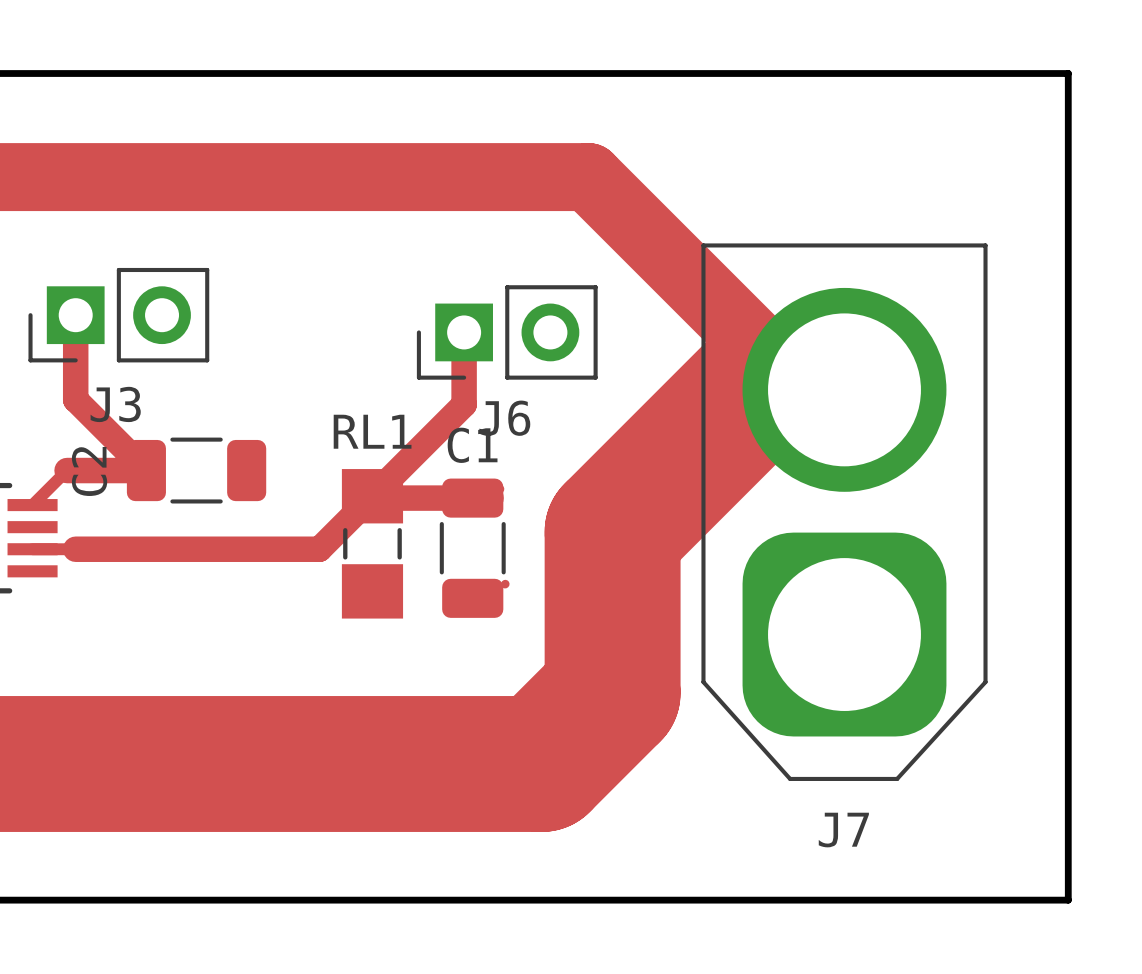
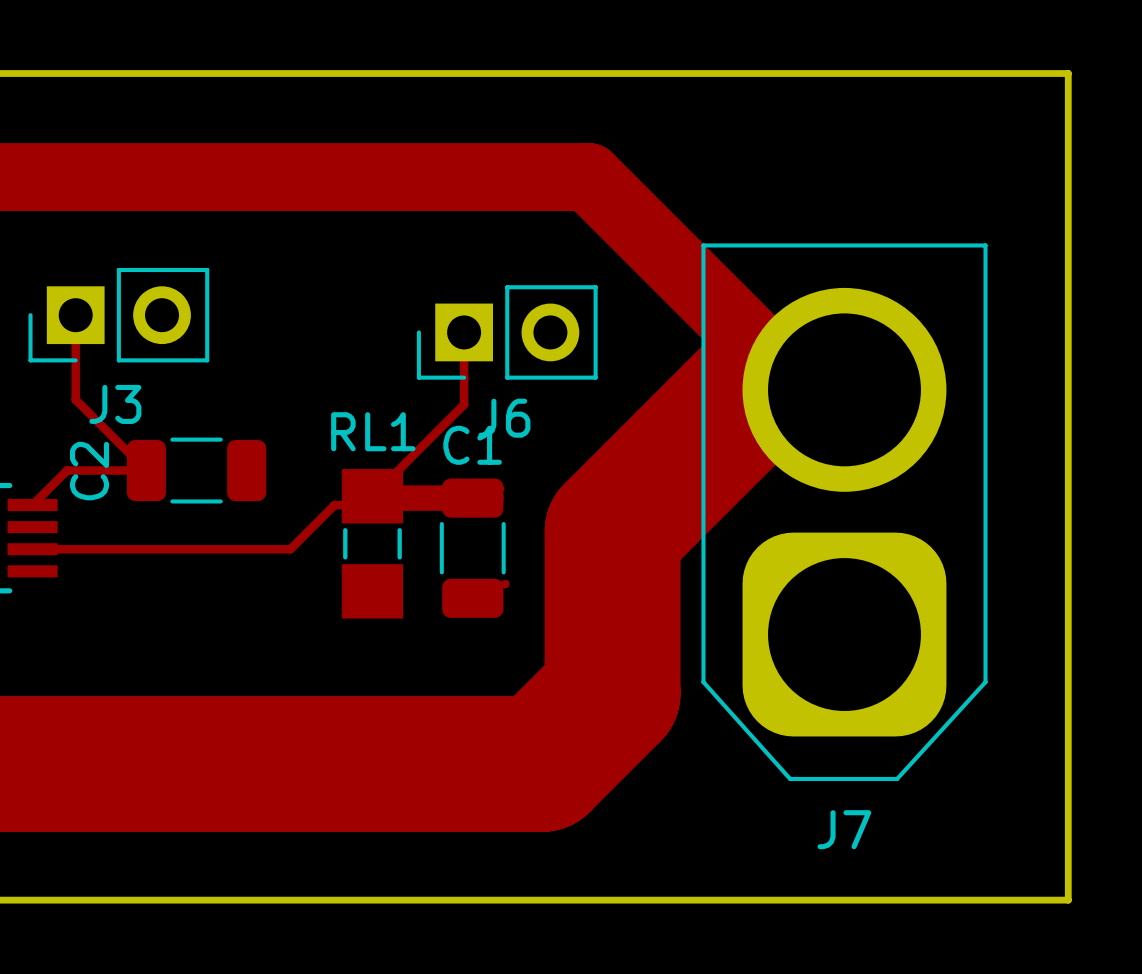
track width: thick (75, 315) (75, 399) (146, 470) (67, 470) (32, 505) -> thin (75, 315) (75, 399) (146, 470) (67, 470) (32, 505)
track width: thick (464, 332) (464, 404) (379, 489) -> thin (464, 332) (464, 404) (379, 489)
track: (372, 496) (319, 549) (290, 549) -> (356, 505) (334, 505) (290, 549)
track width: thick (32, 549) (290, 549) -> thin (32, 549) (290, 549)

